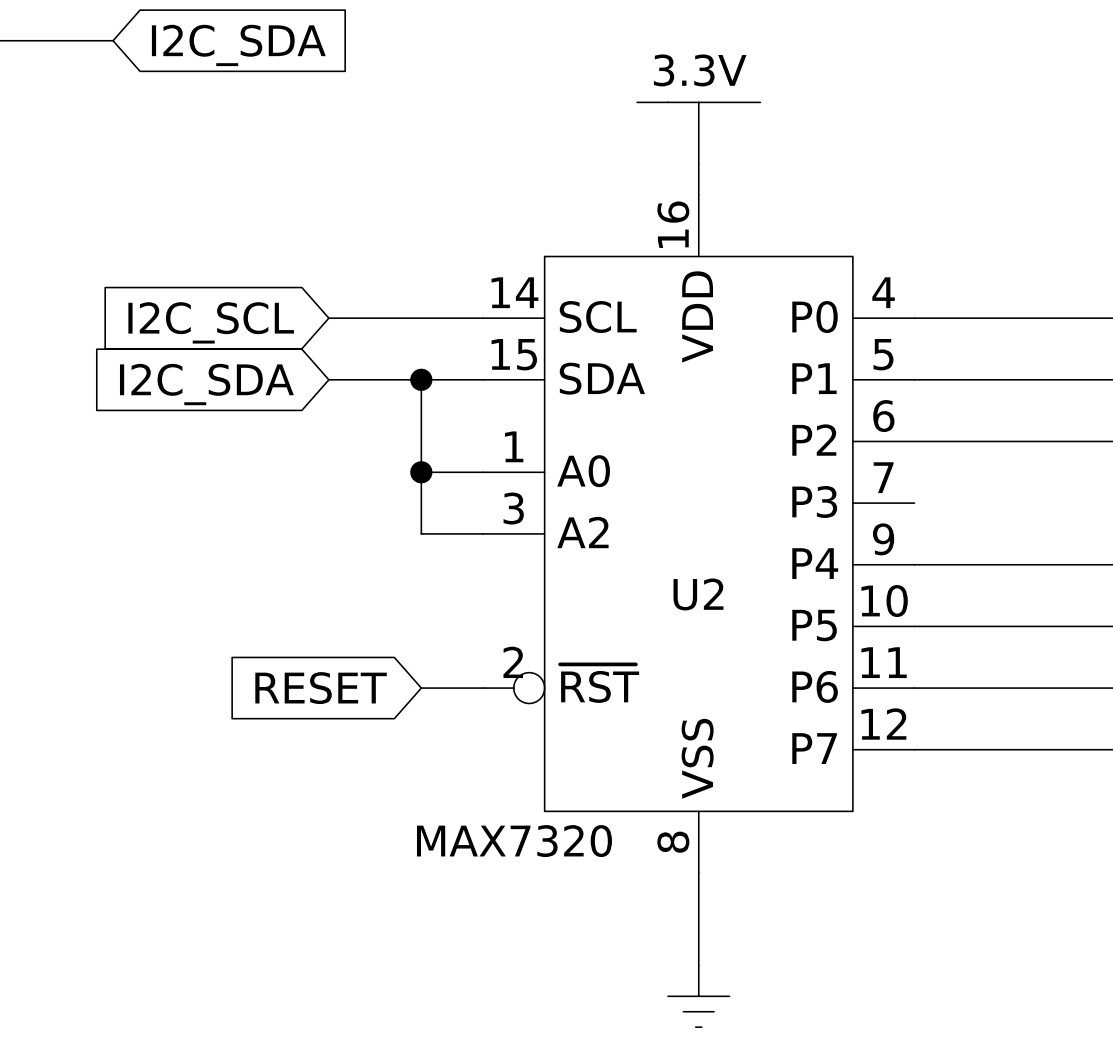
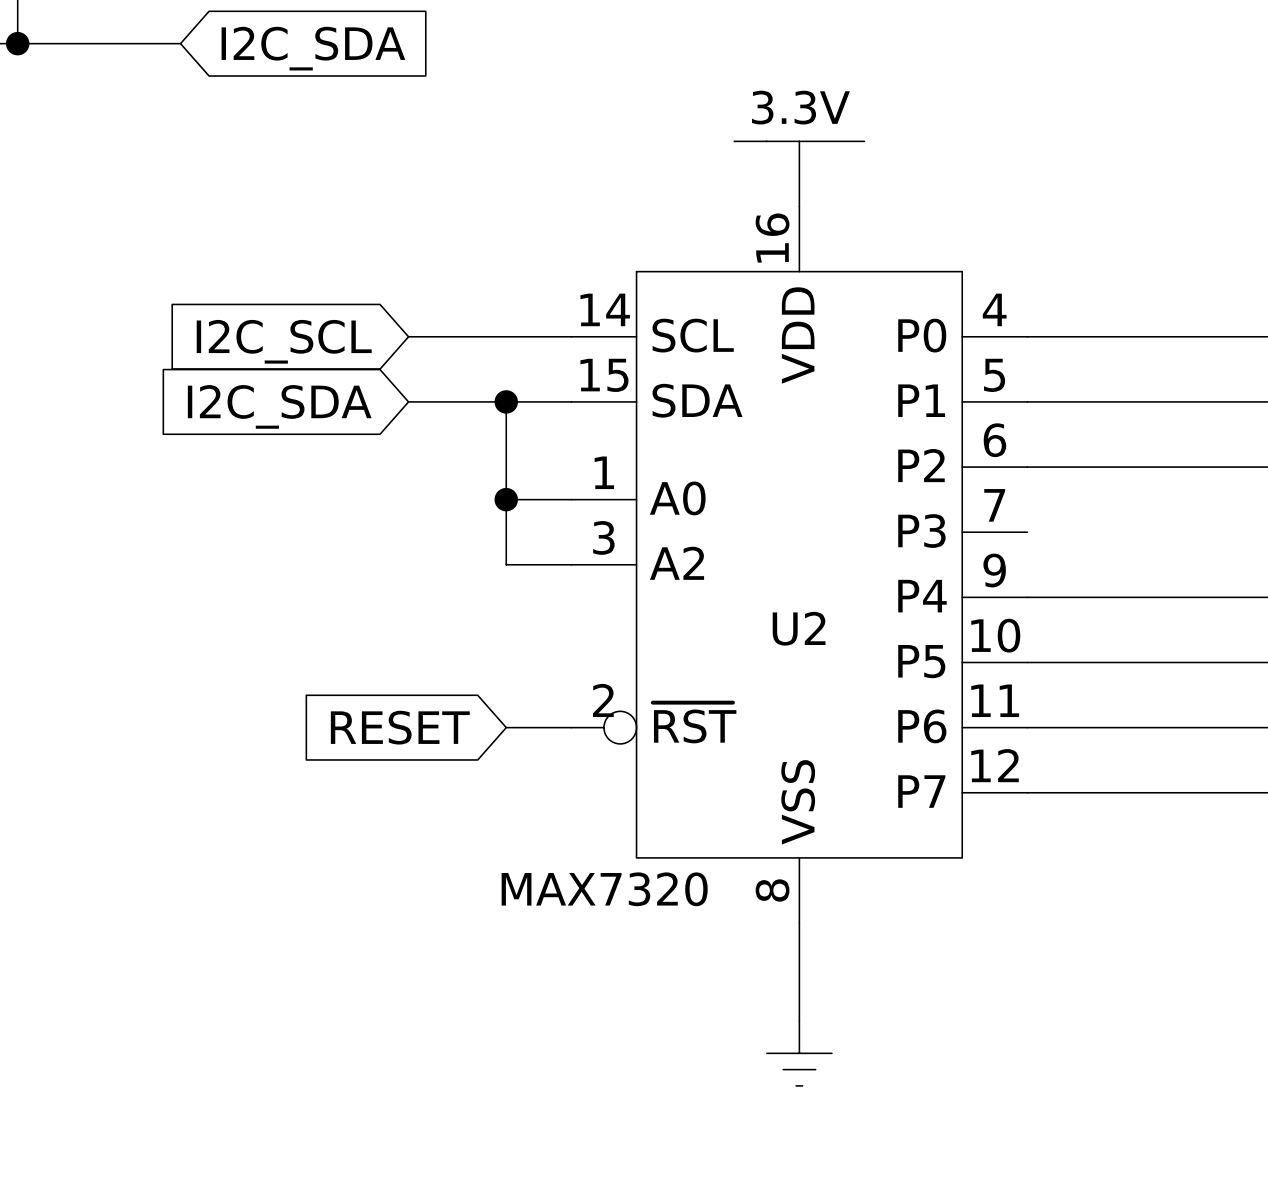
part position: (698, 133) -> (799, 173)

